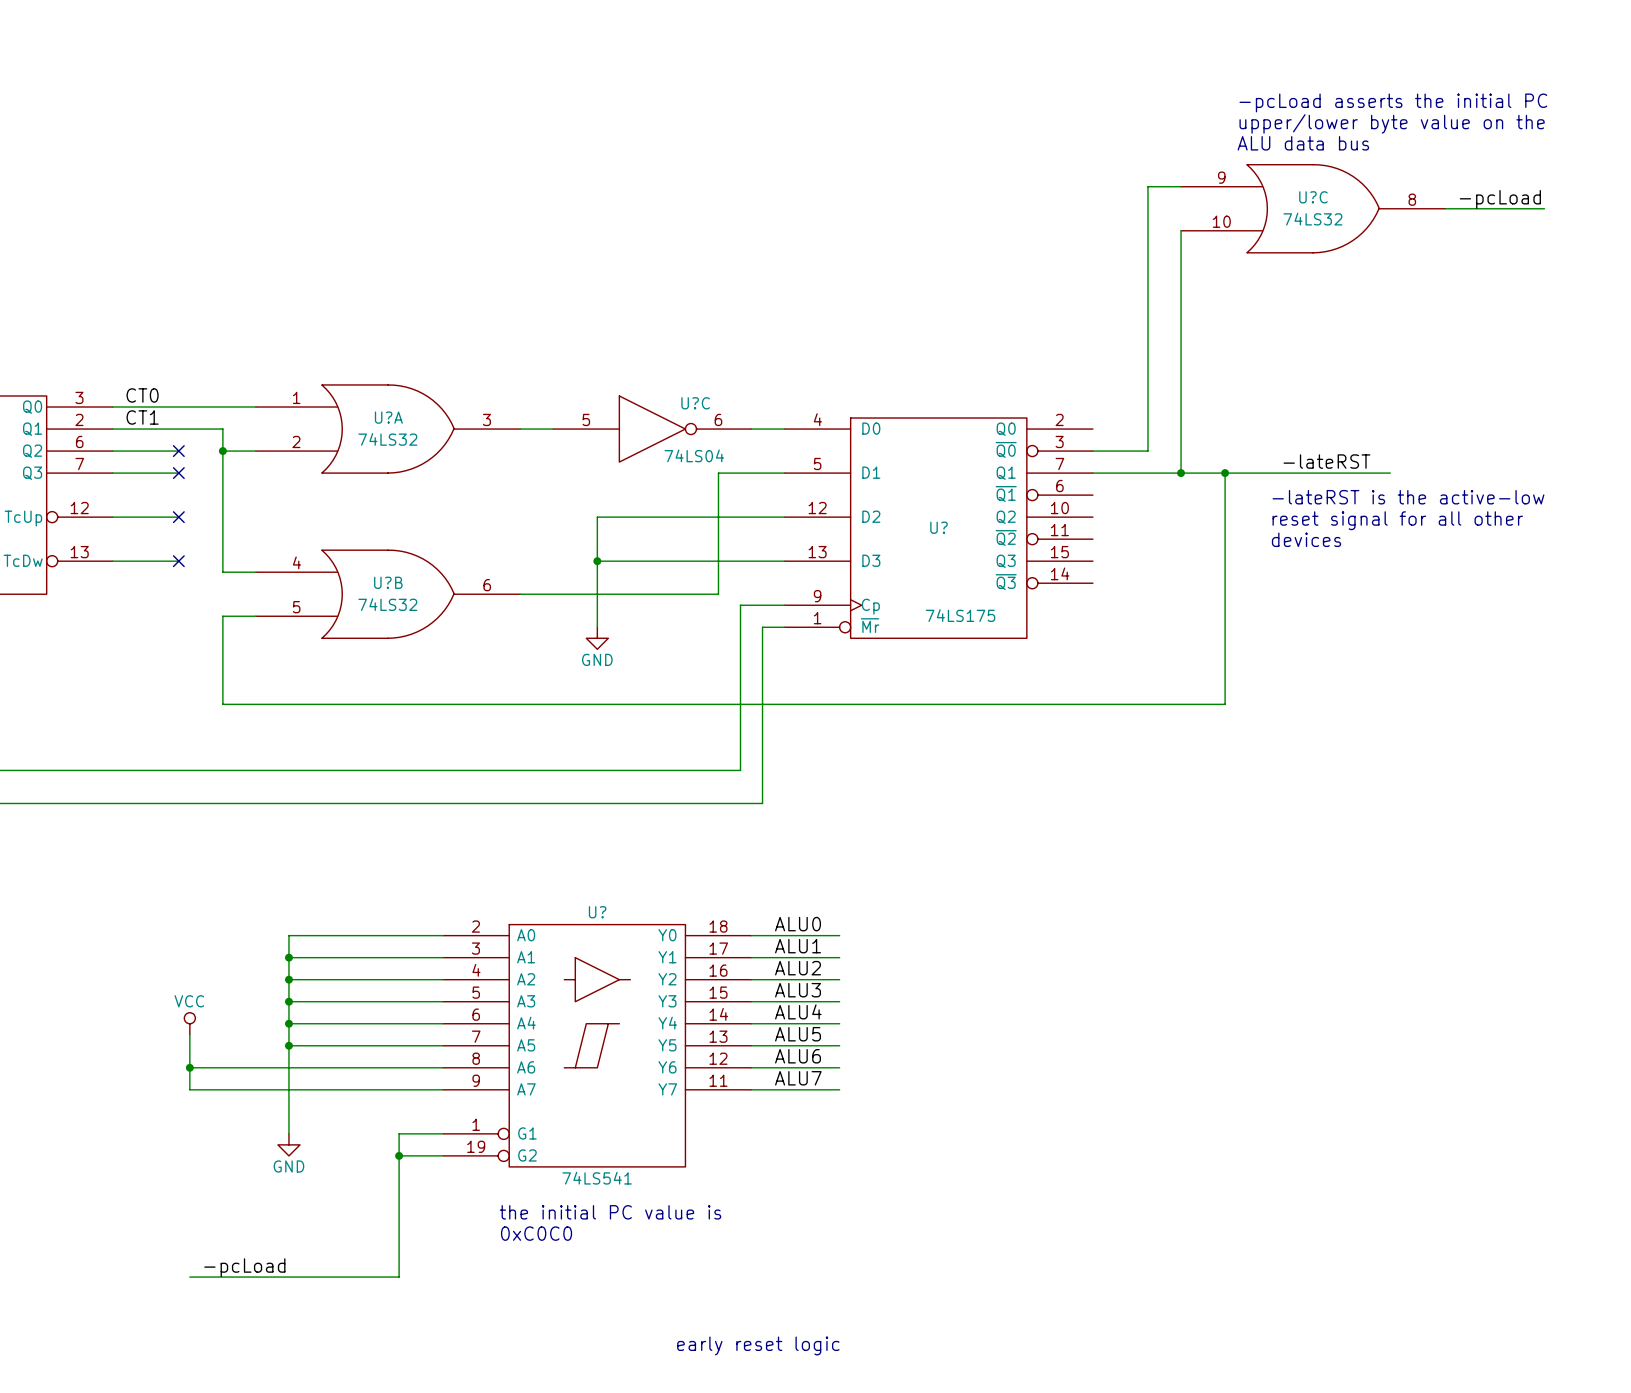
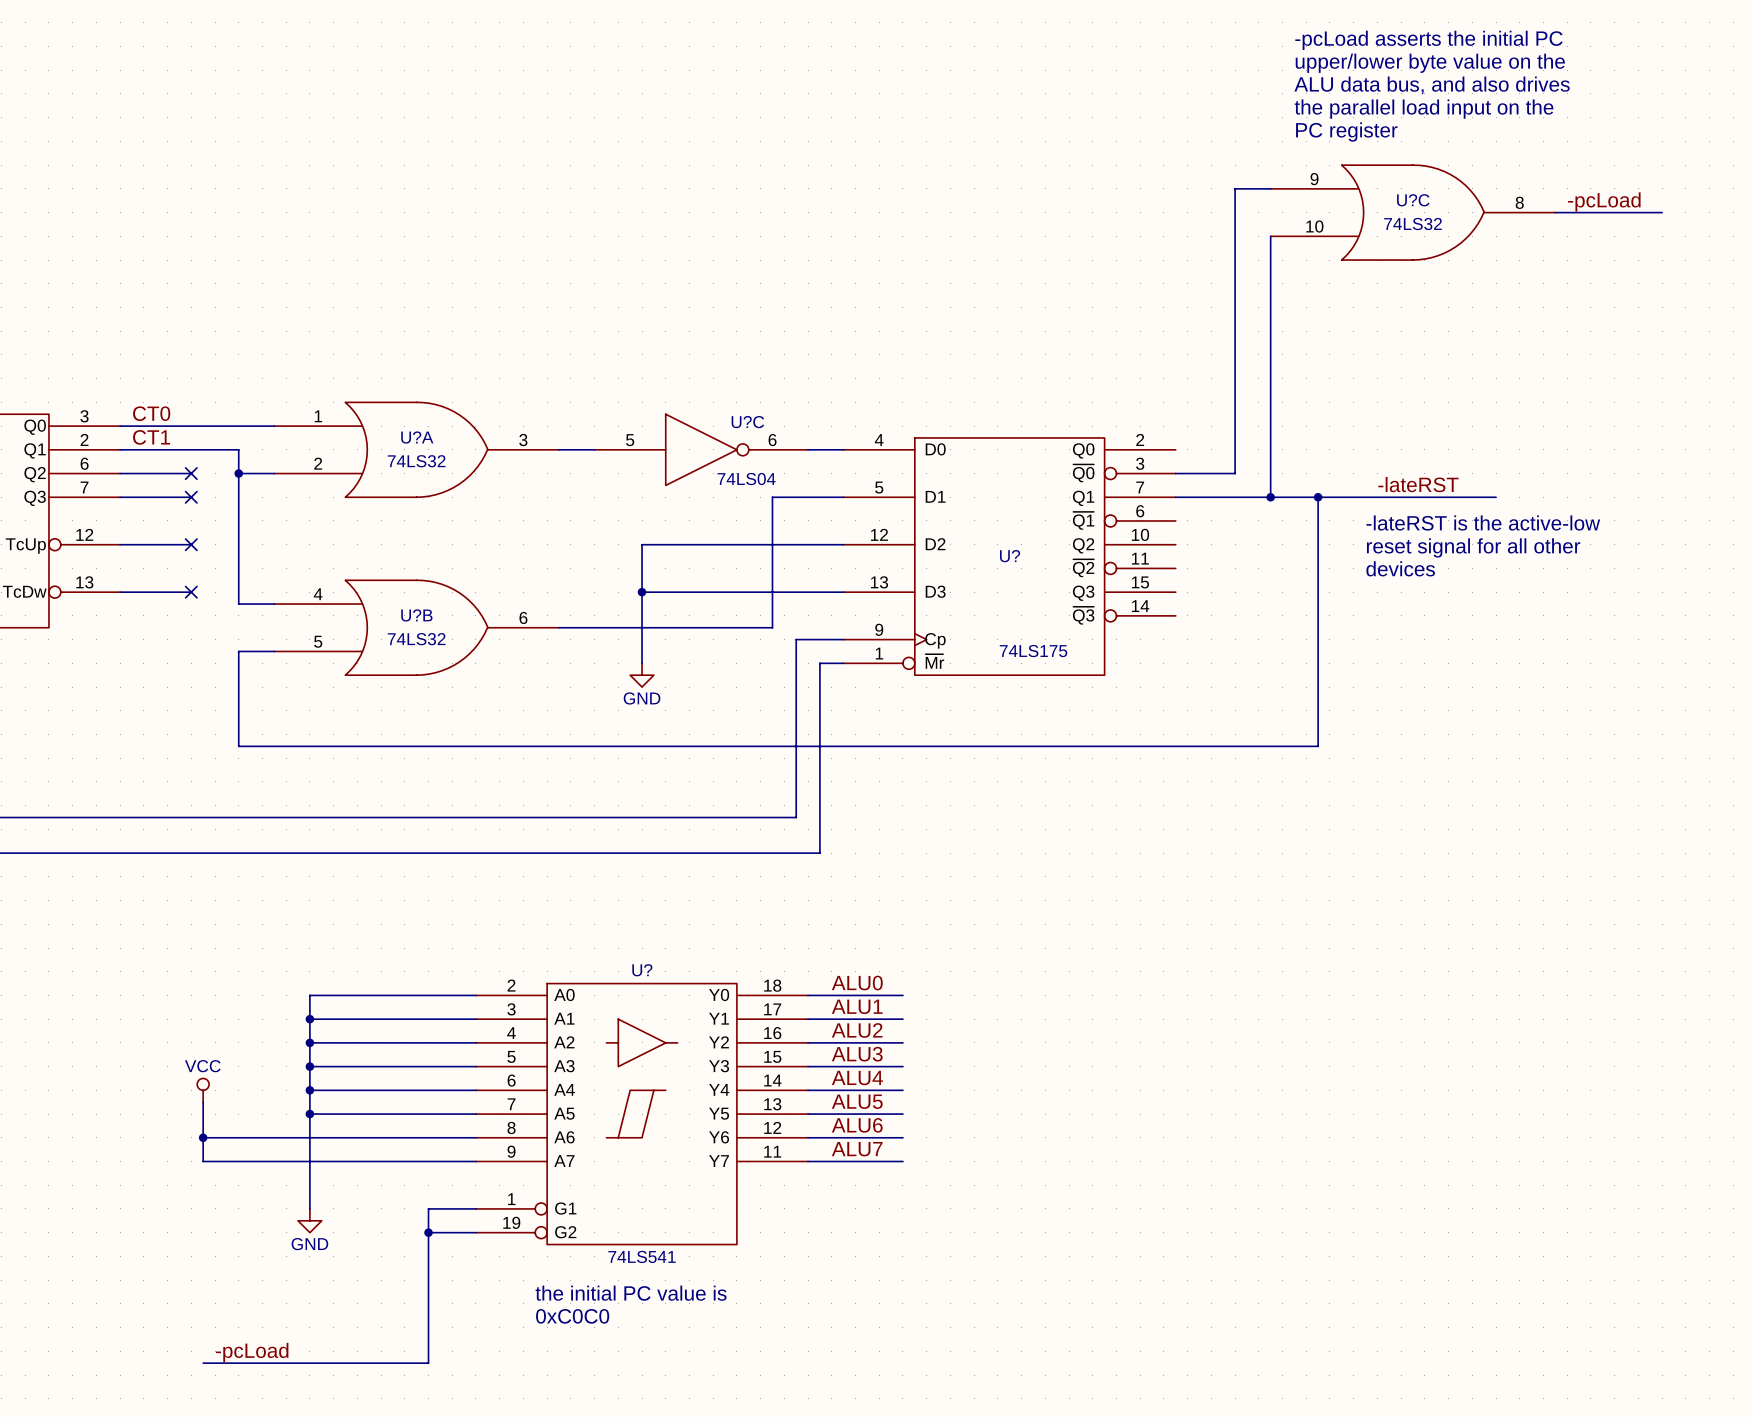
text: none -> ALU data bus, and also drives (1432, 85)
text position: -pcLoad asserts the initial PC (1393, 102) -> -pcLoad asserts the initial PC (1428, 40)
text: none -> the parallel load input on the (1424, 109)
text position: upper/lower byte value on the (1392, 123) -> upper/lower byte value on the (1430, 63)
text: none -> PC register (1346, 132)
text: ALU data bus (1303, 143) -> none

